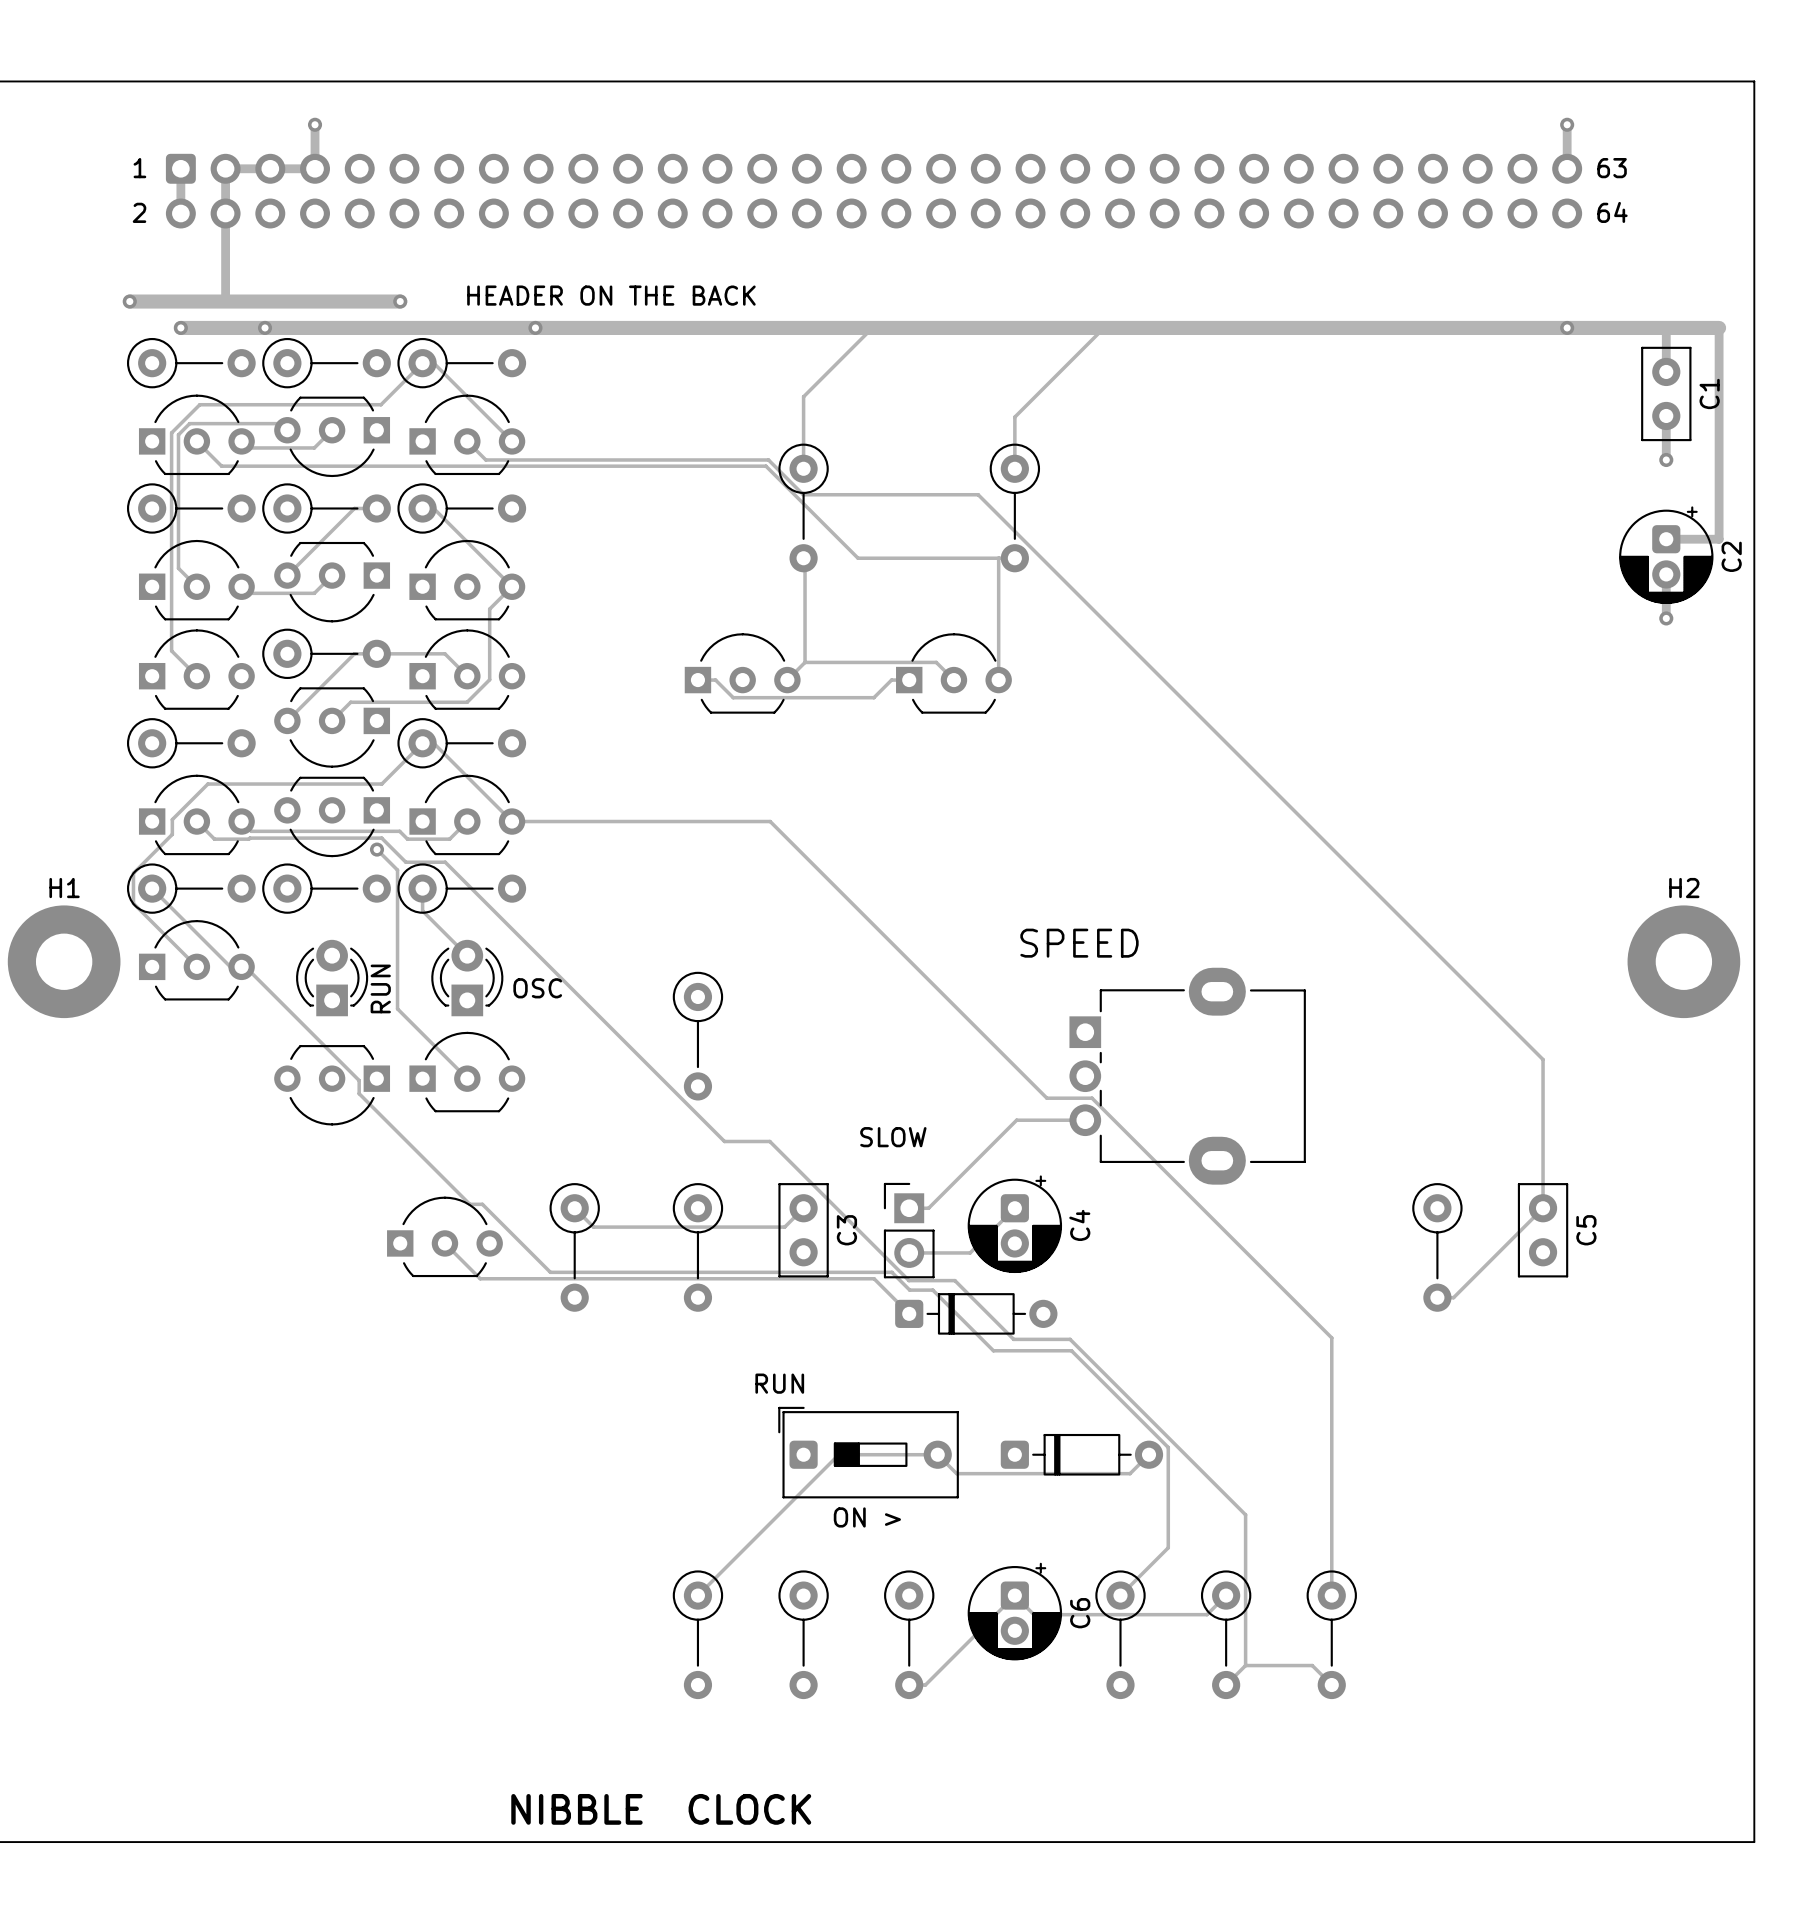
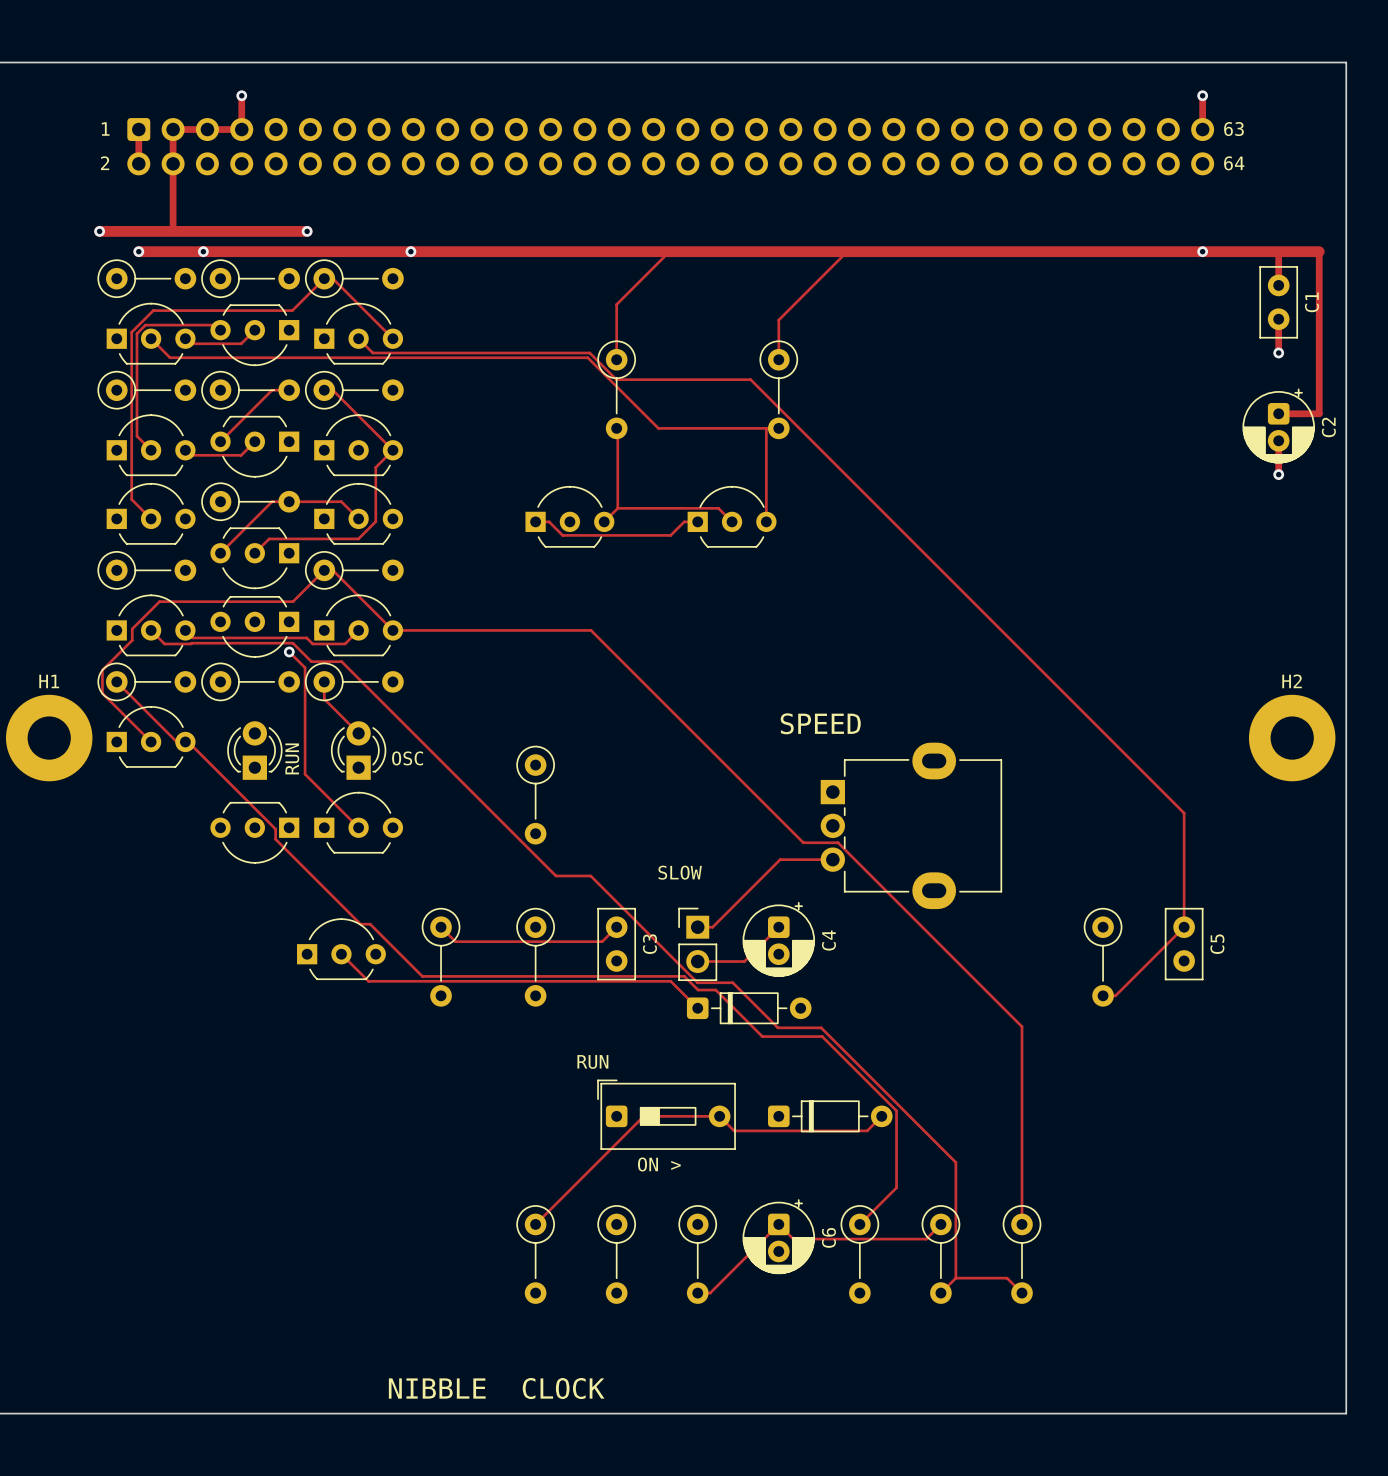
text: HEADER ON THE BACK (611, 295) -> none

